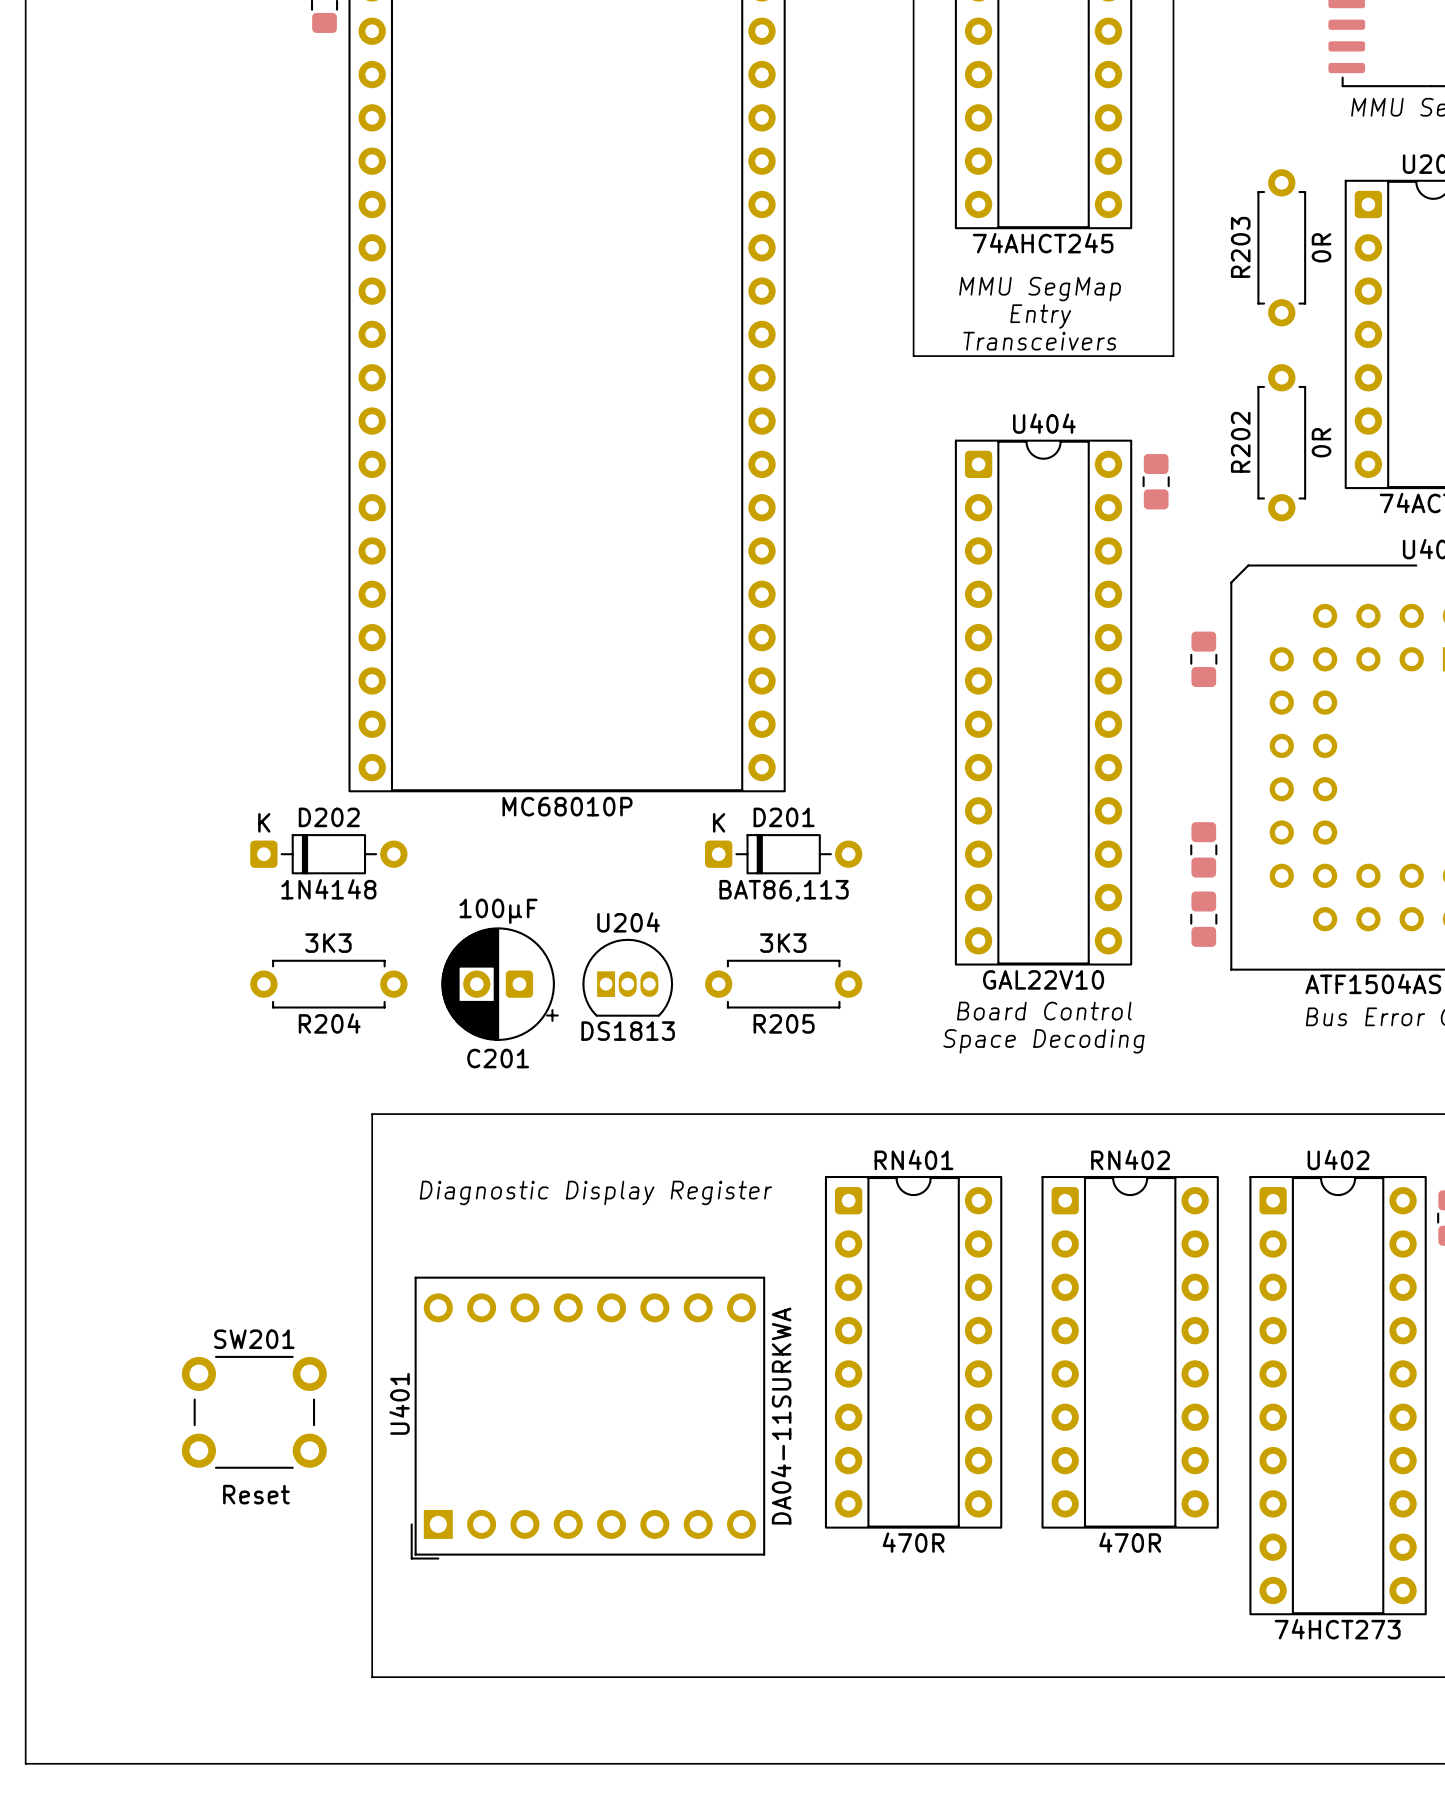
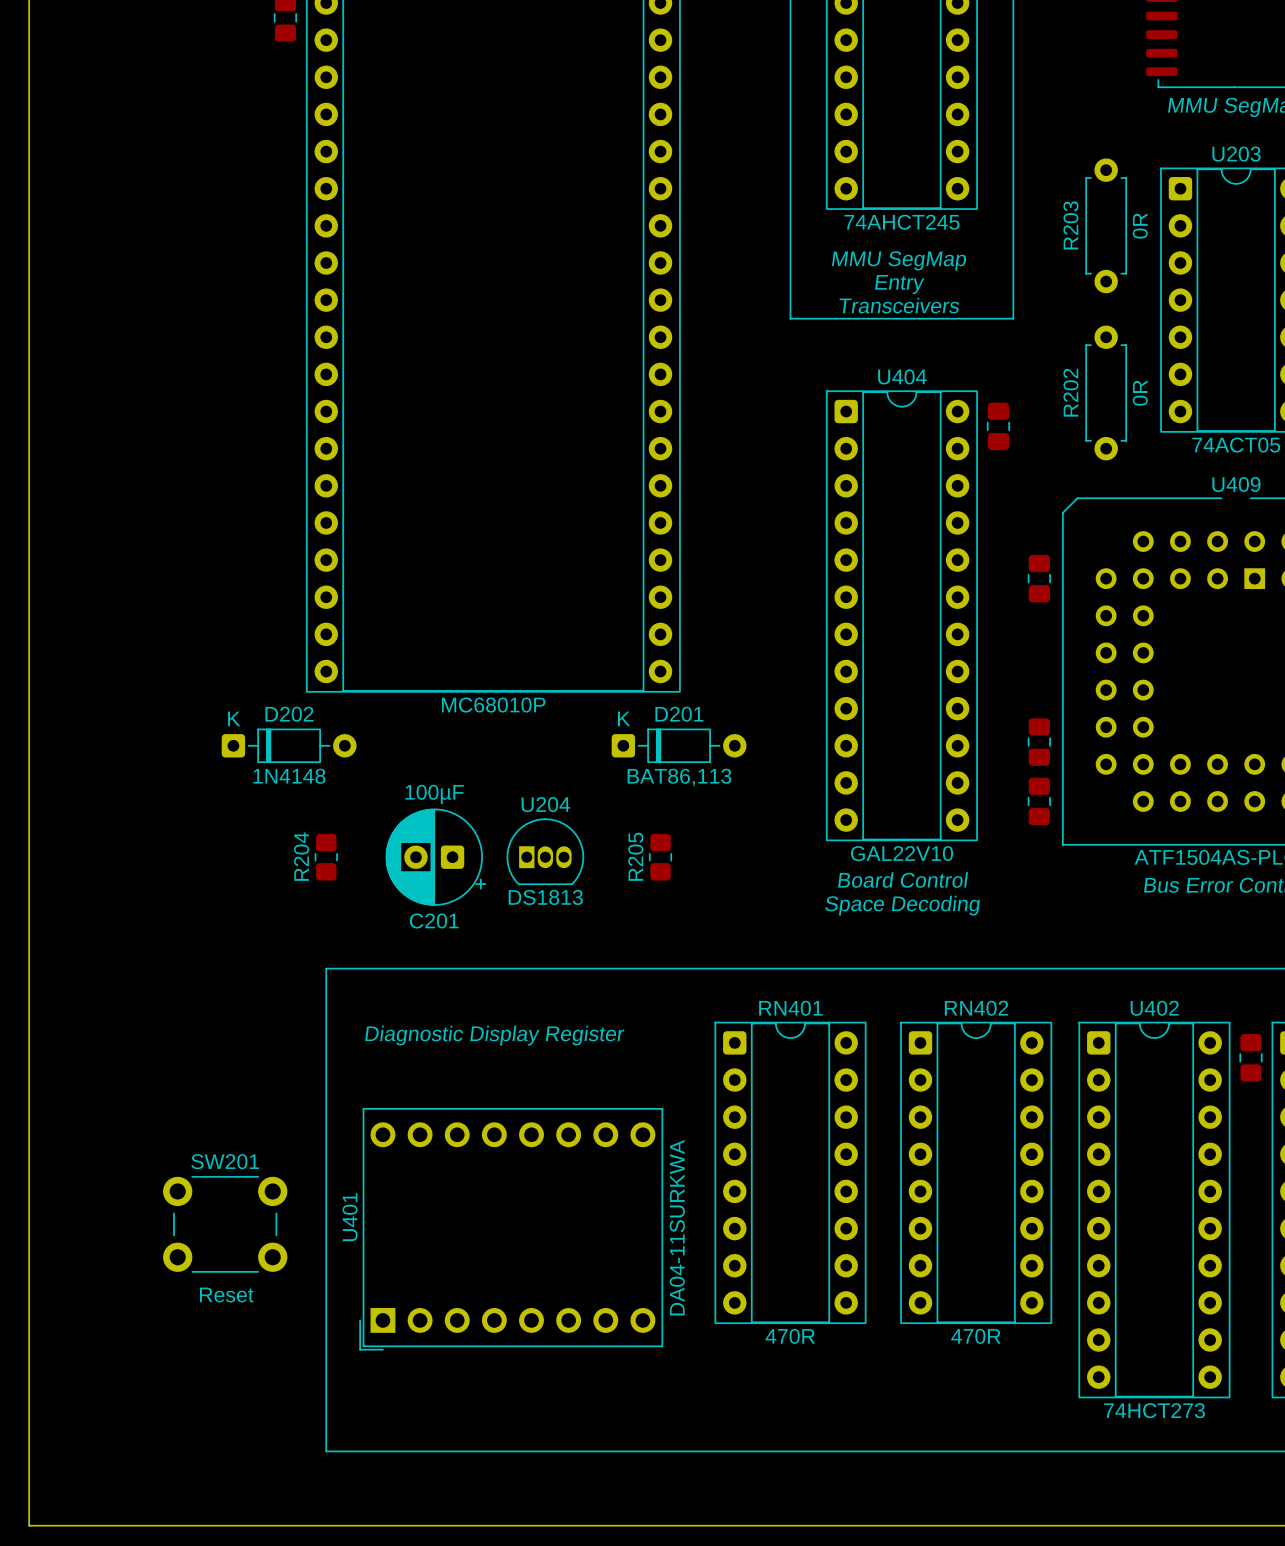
R204 value: 3K3 (328, 943) -> none
R205 value: 3K3 (783, 943) -> none
R204 footprint: [250, 959, 408, 1009] -> [314, 833, 338, 881]
R205 footprint: [705, 959, 863, 1009] -> [648, 833, 673, 881]
R204 name position: R204 (329, 1023) -> R204 (301, 856)
R205 name position: R205 (784, 1023) -> R205 (635, 856)

